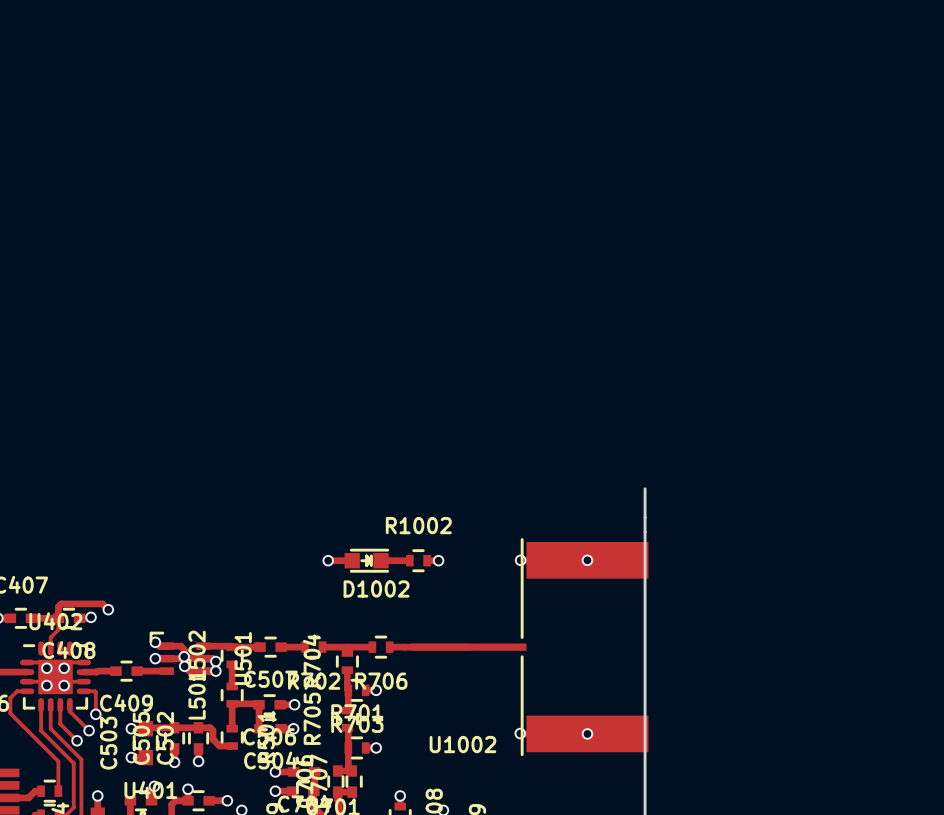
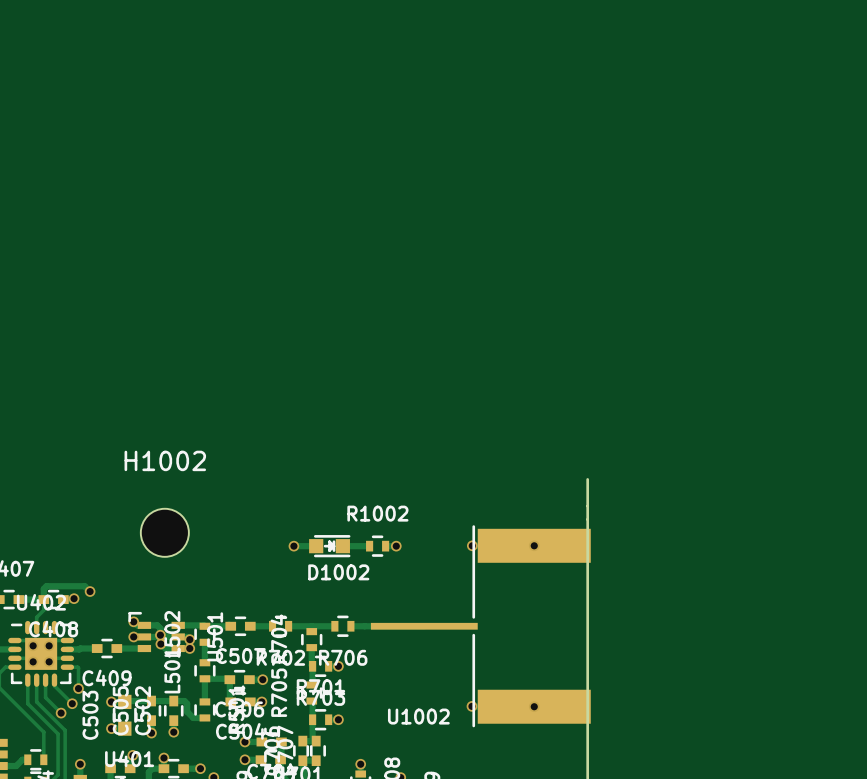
H1002: none -> (164, 532)

